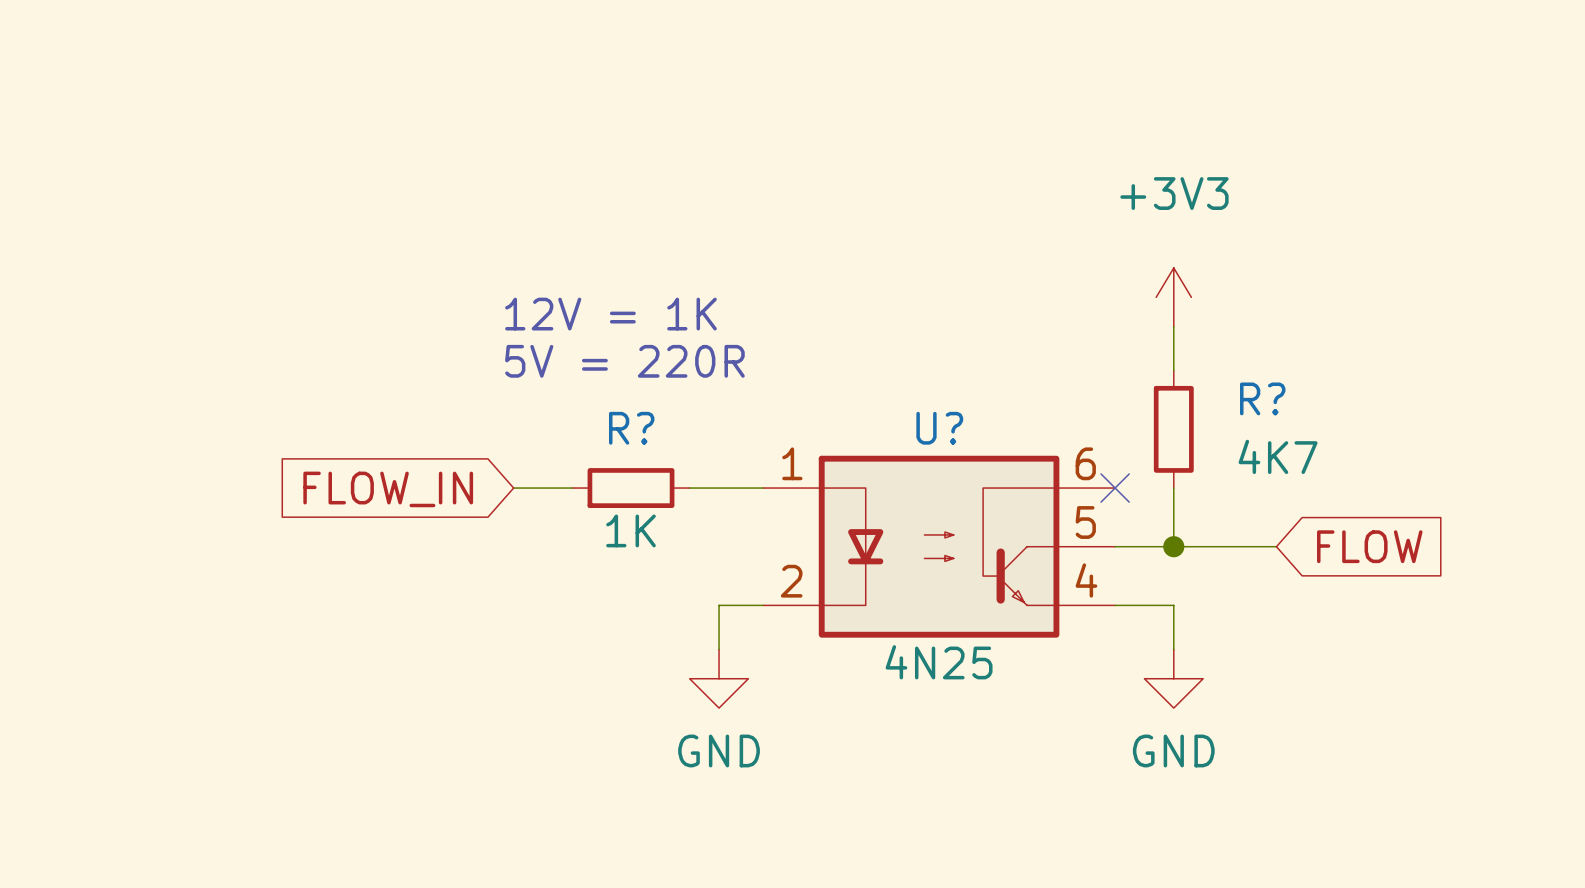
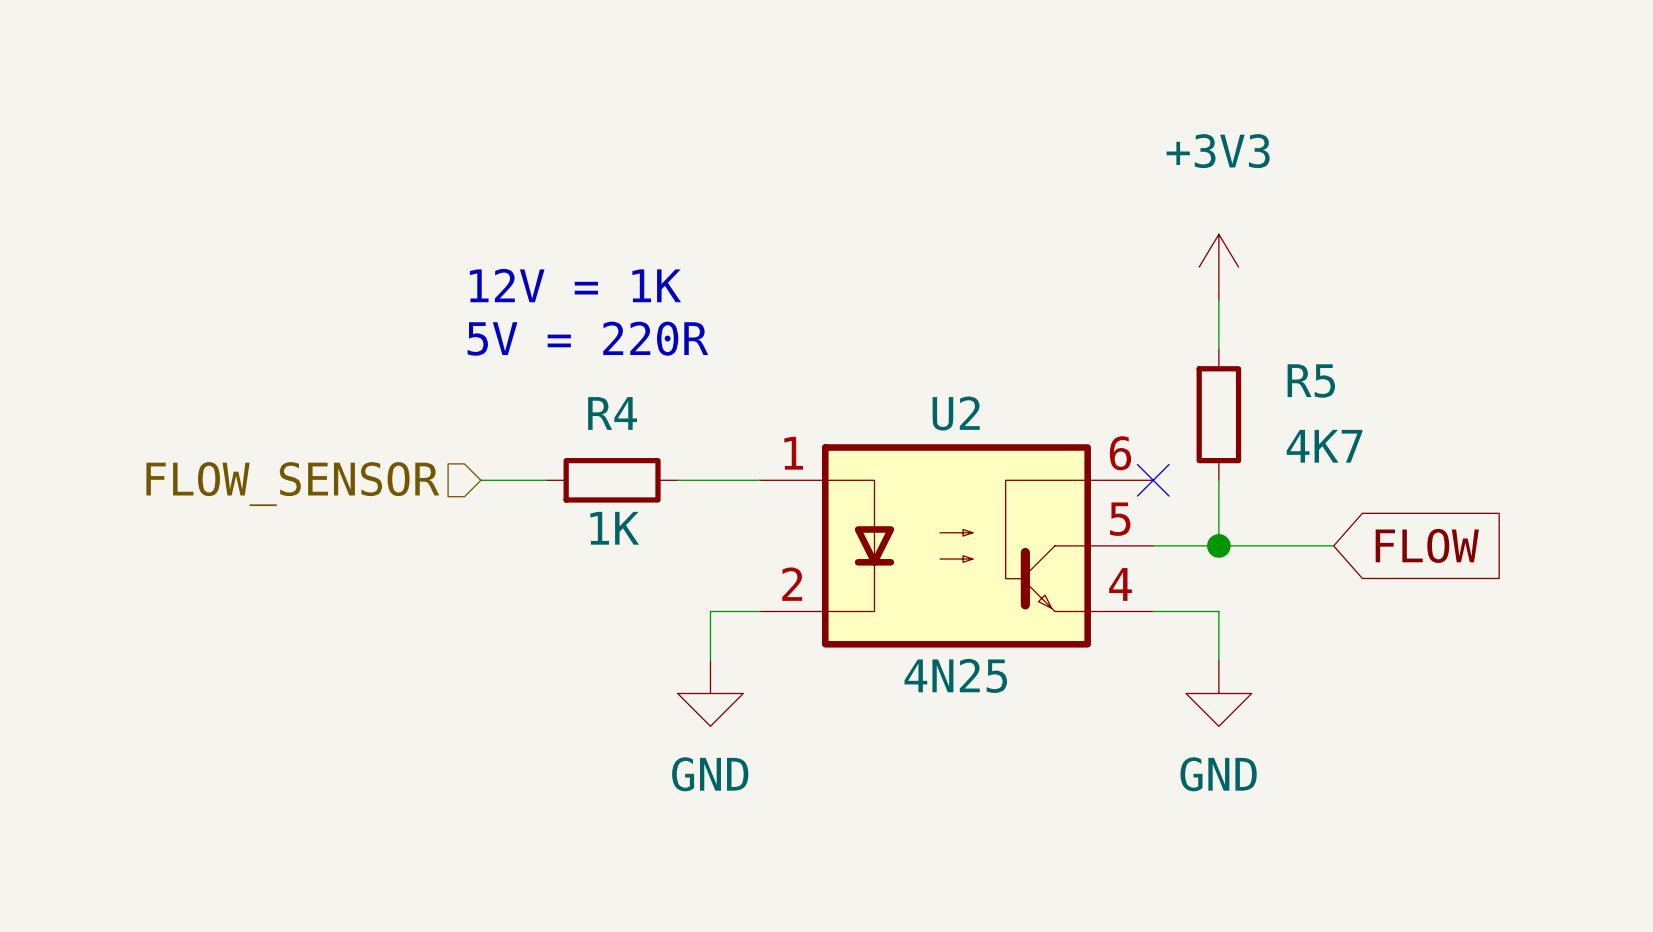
R? name: R? (1262, 398) -> R5 (1311, 380)
R? name: R? (631, 428) -> R4 (612, 413)
U? name: U? (939, 428) -> U2 (956, 413)
hierarchical label: none -> FLOW_SENSOR (292, 484)
global label: FLOW_IN (388, 489) -> none

